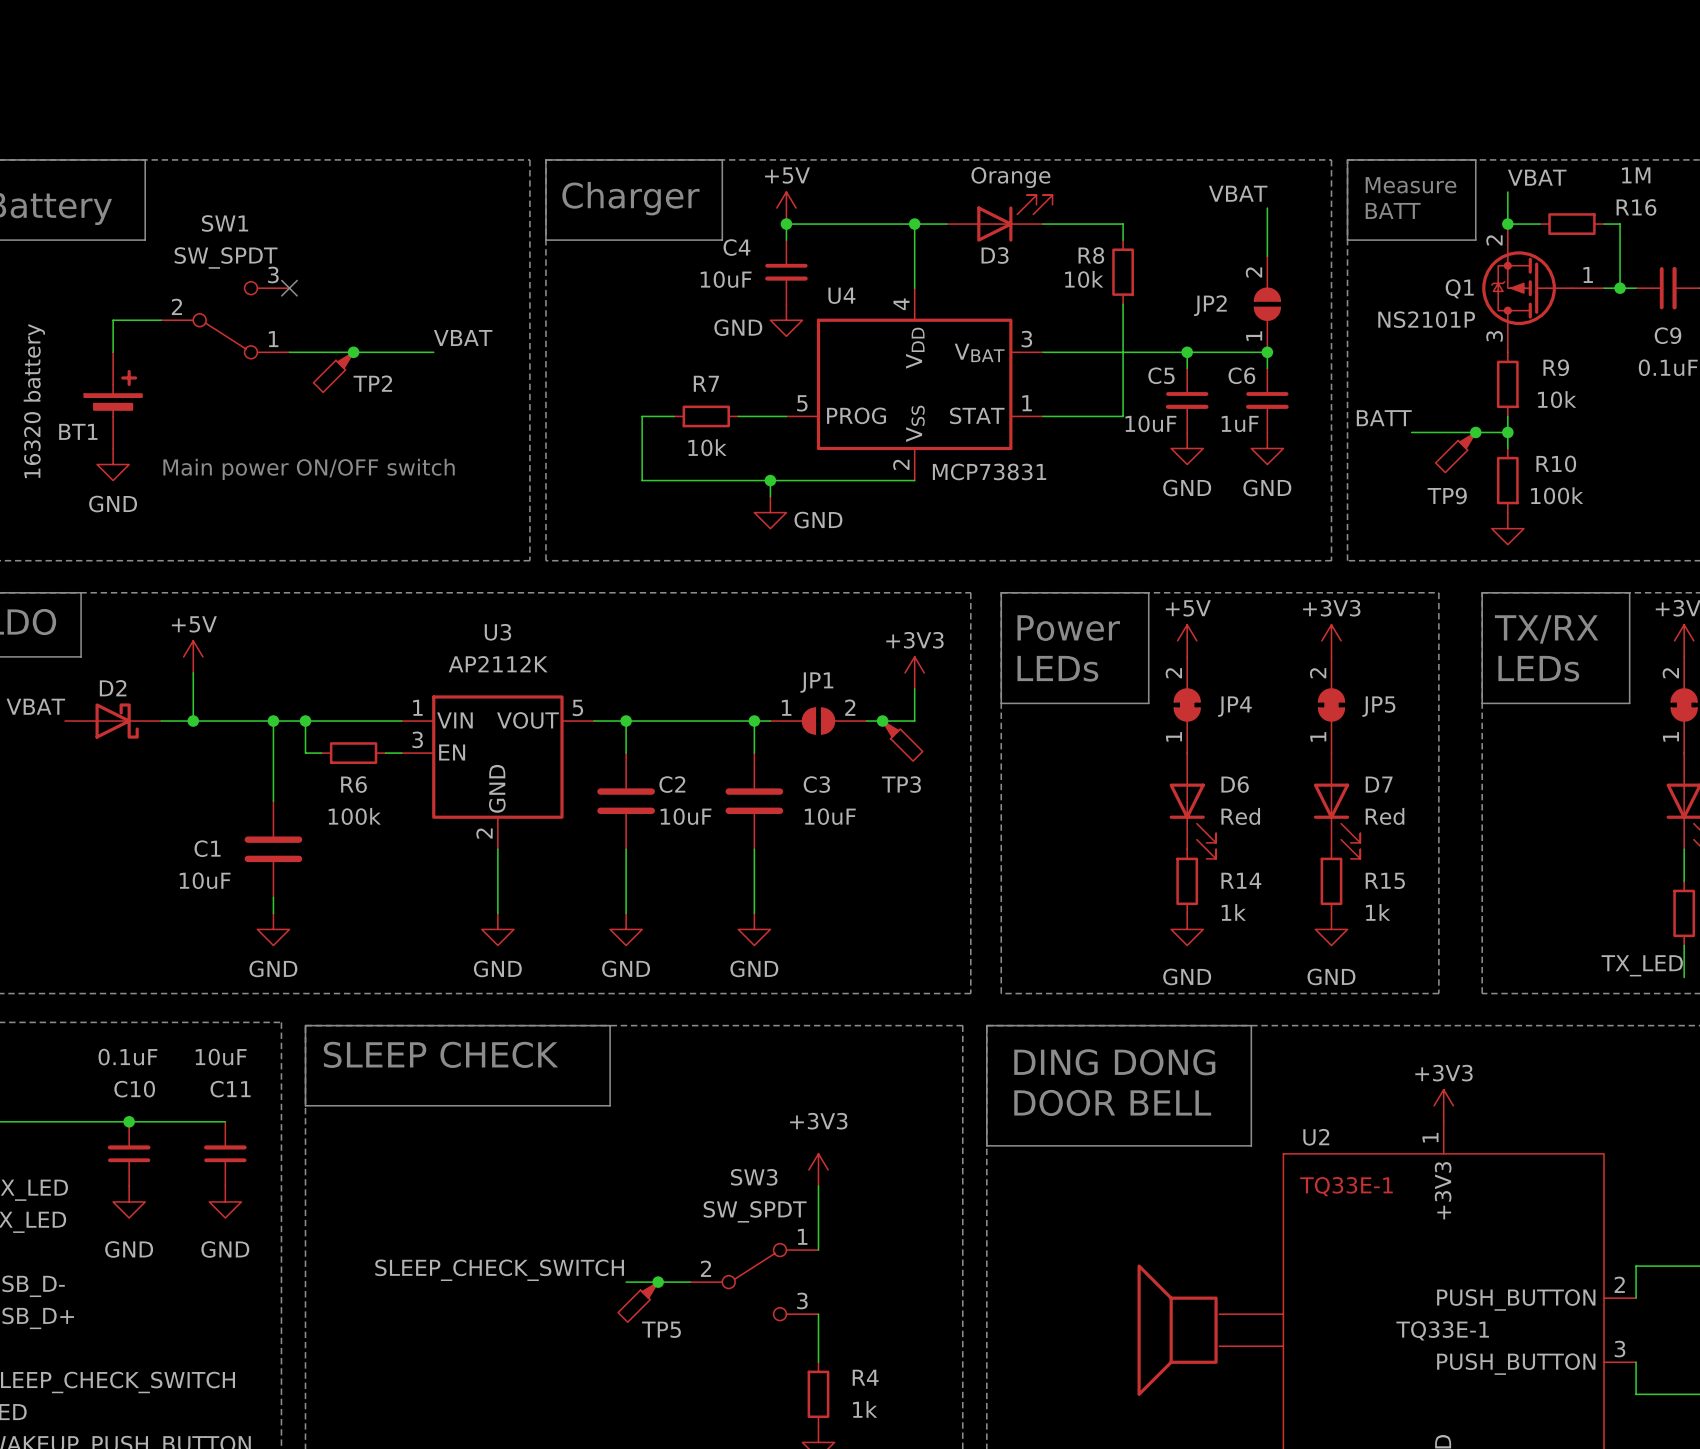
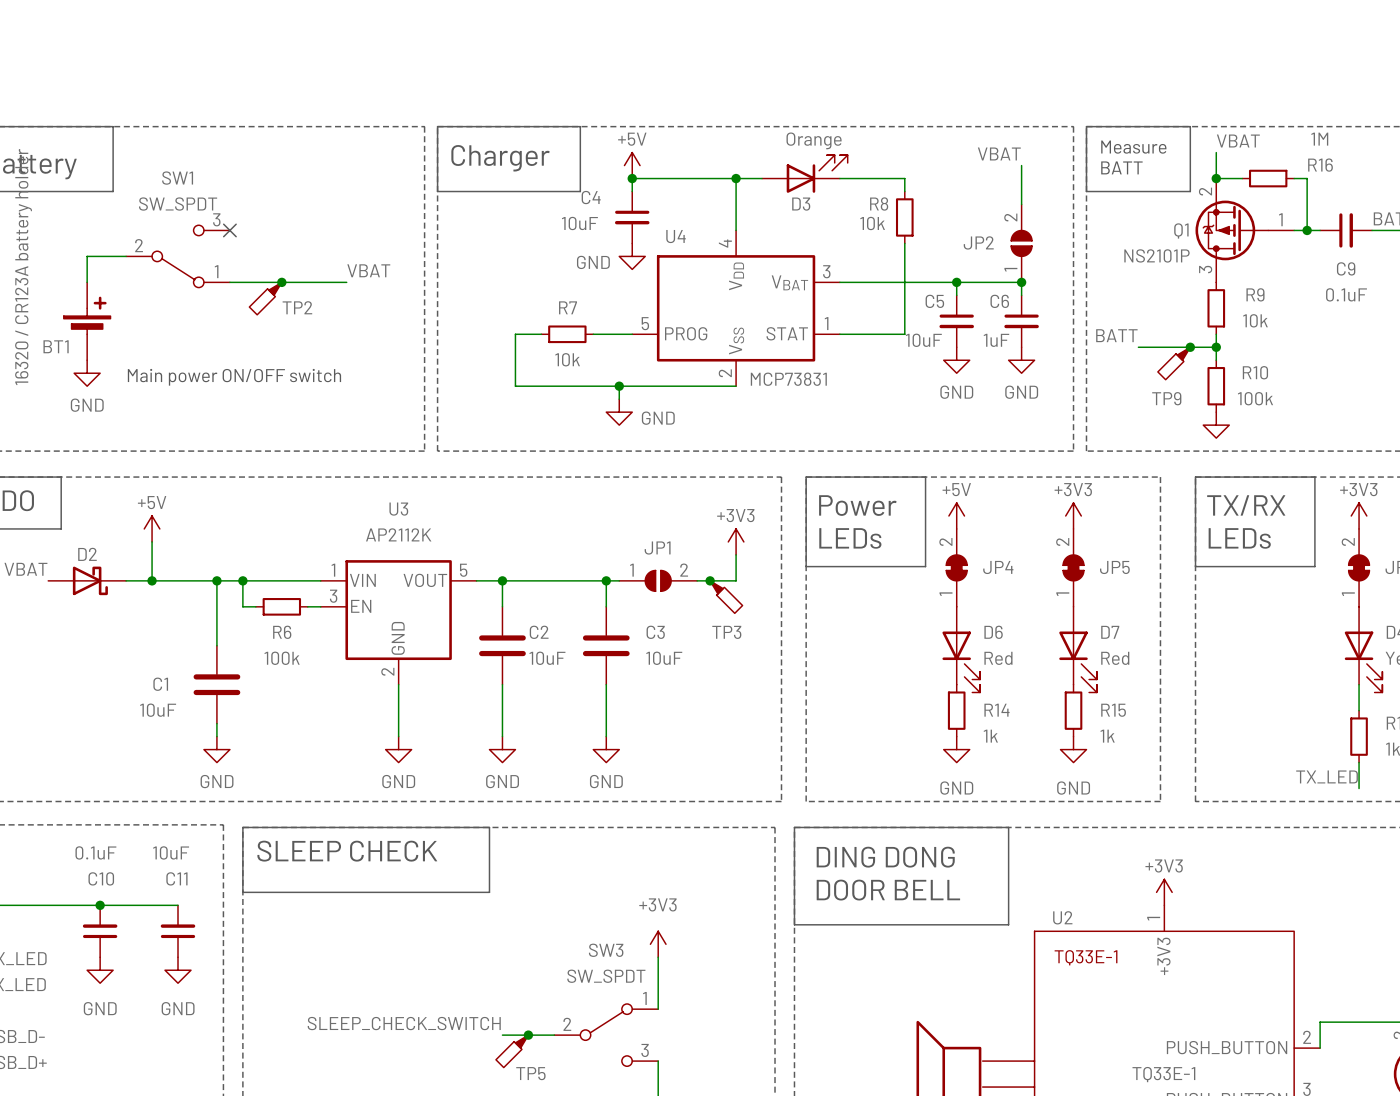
BT1 value: 16320 battery (34, 401) -> 16320 / CR123A battery holder (23, 267)

